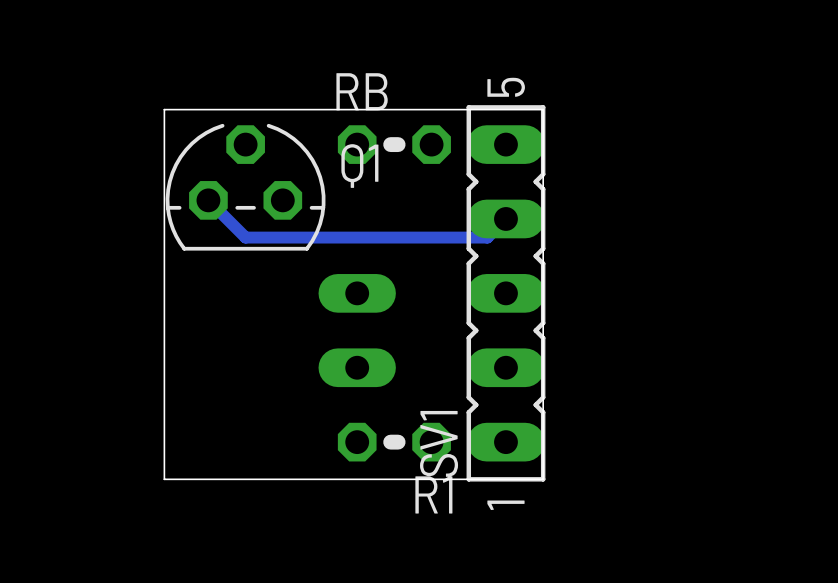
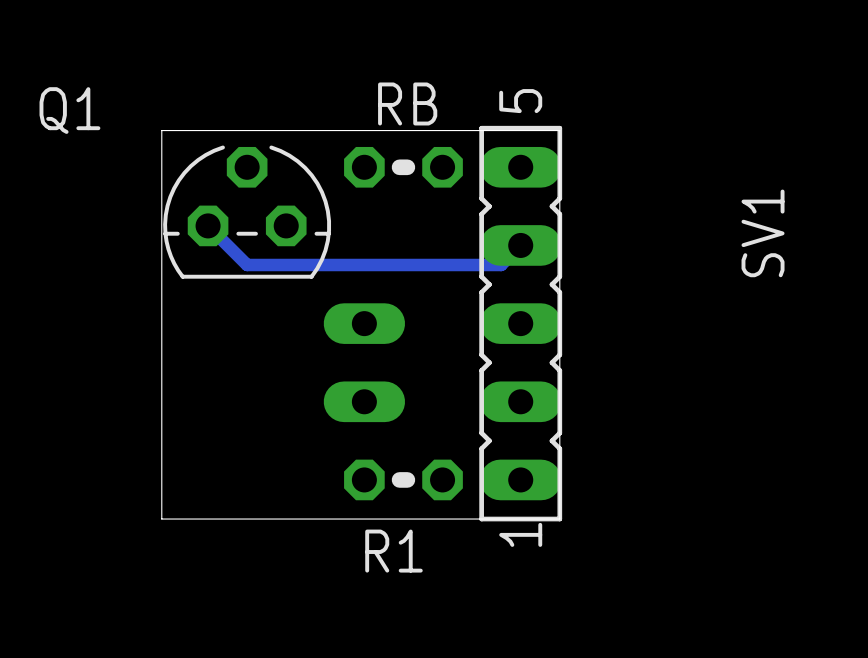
RB name position: RB (362, 91) -> RB (407, 103)
Q1 name position: Q1 (359, 166) -> Q1 (69, 110)
SV1 name position: SV1 (439, 443) -> SV1 (763, 233)
R1 name position: R1 (433, 494) -> R1 (393, 551)

